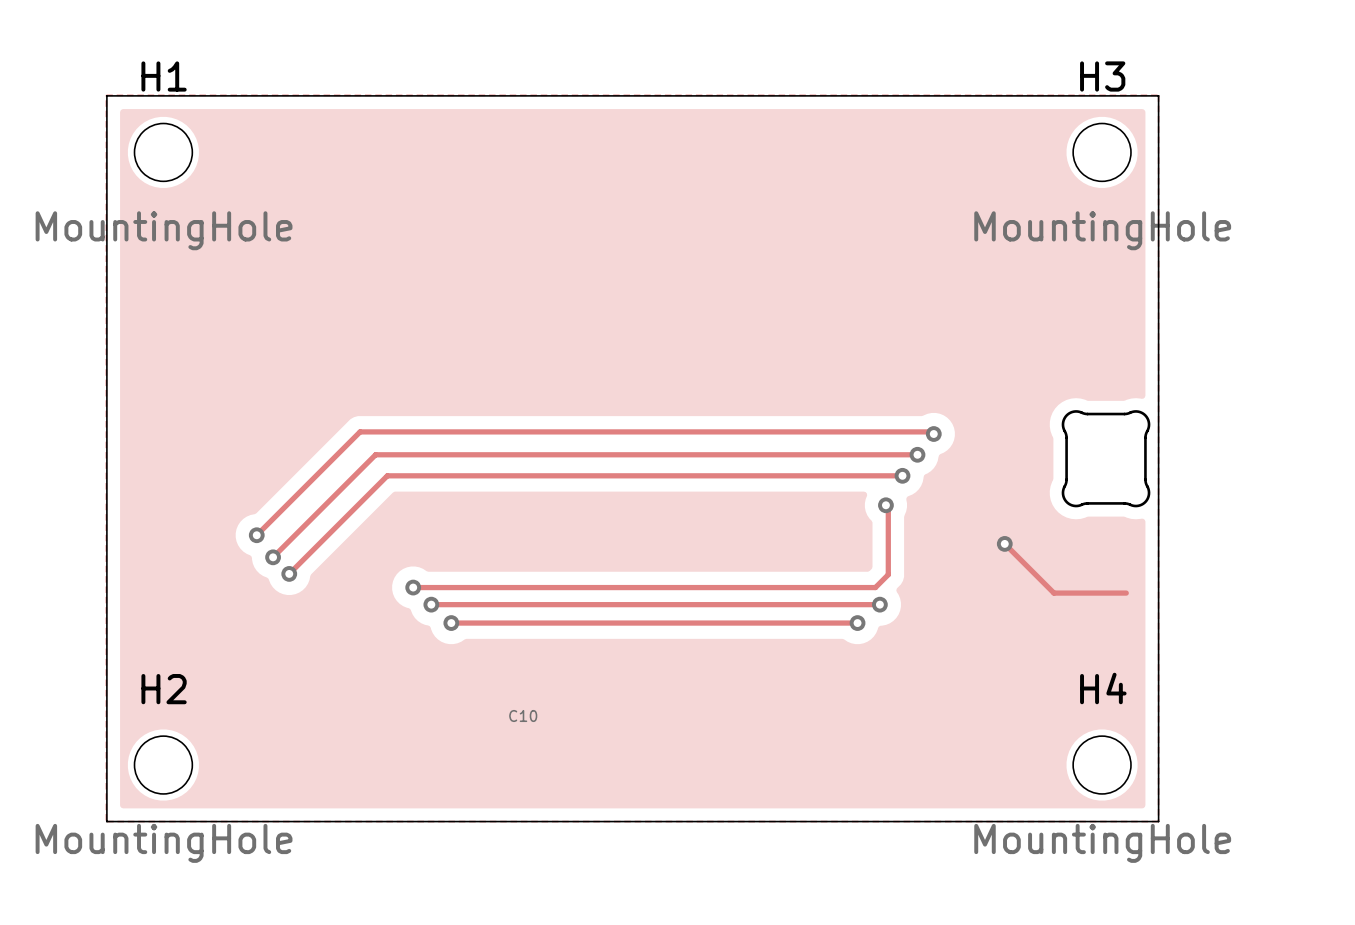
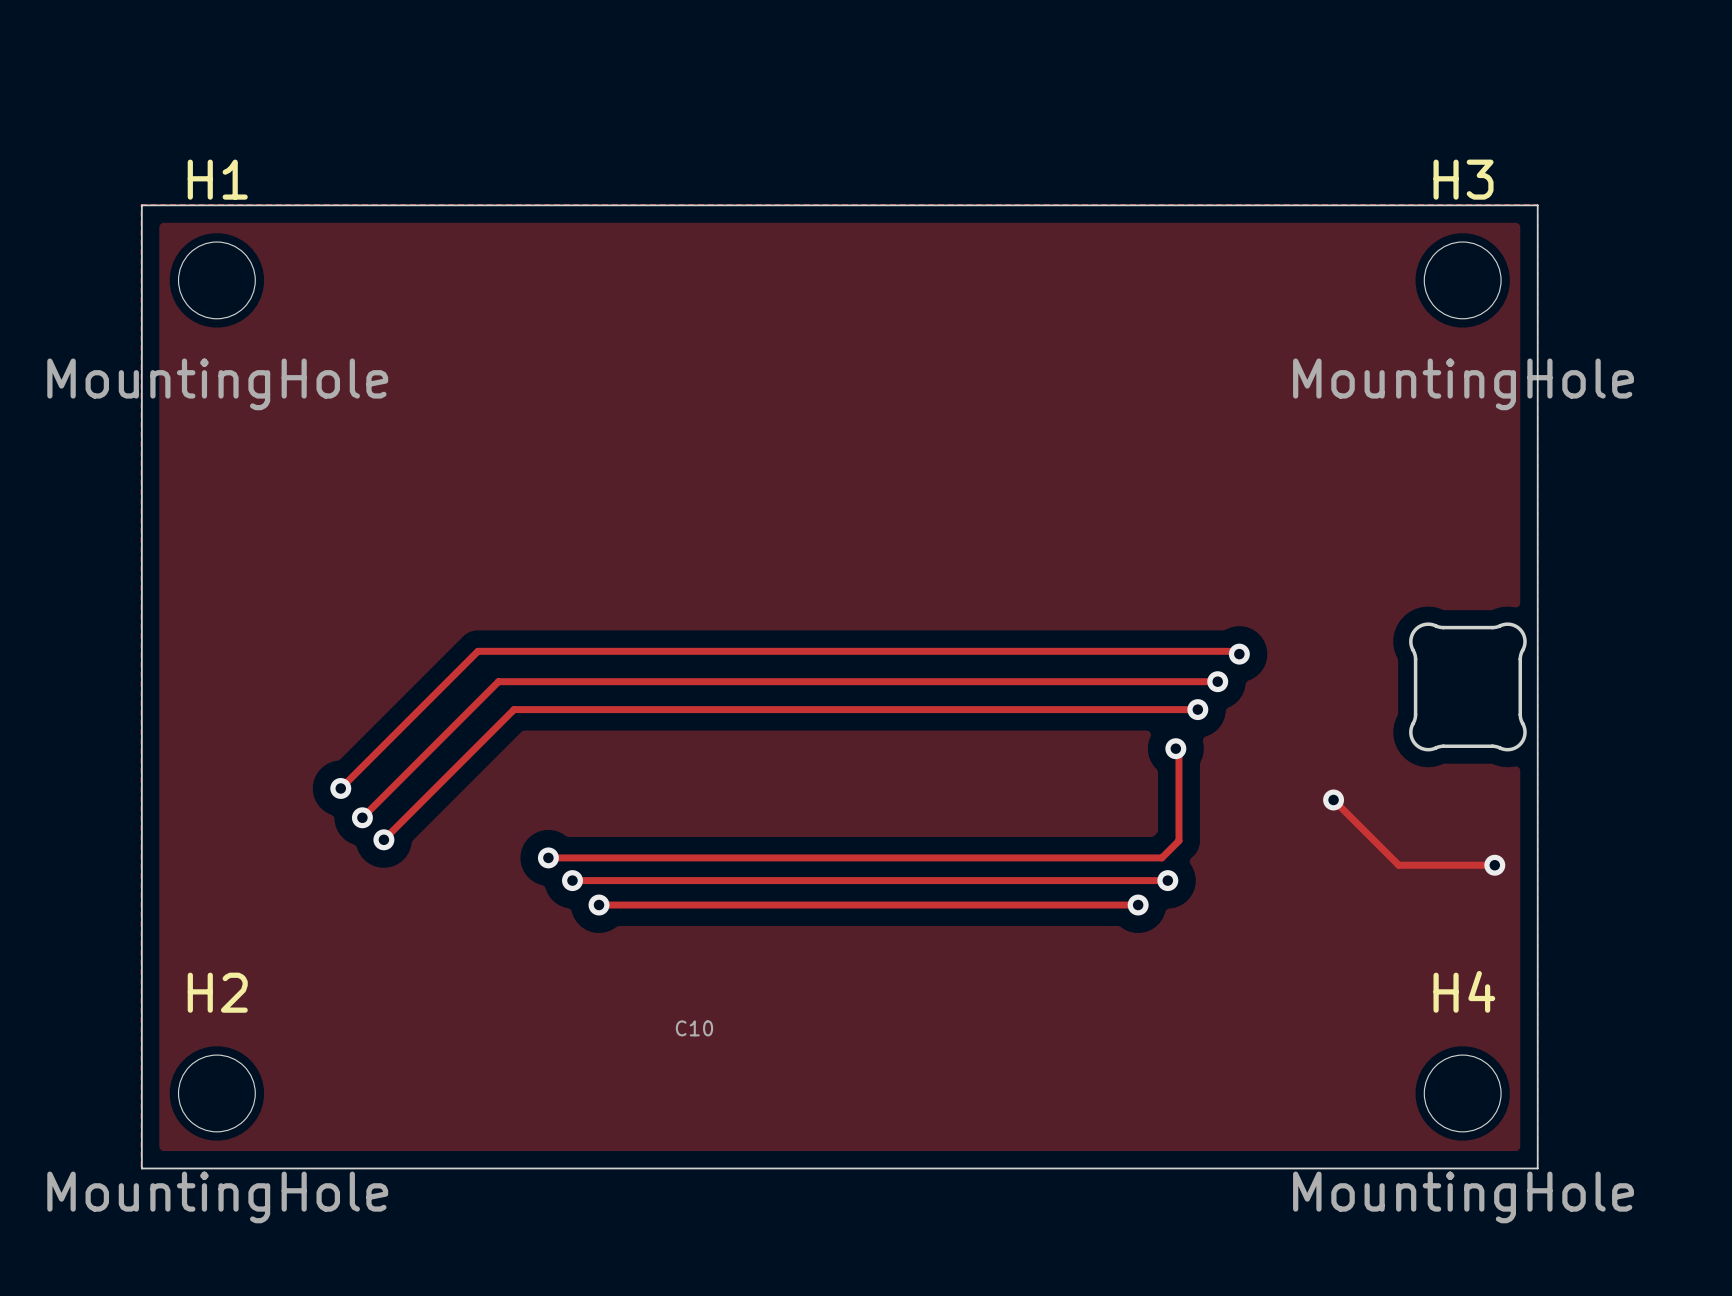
via: none -> (1494, 865)

